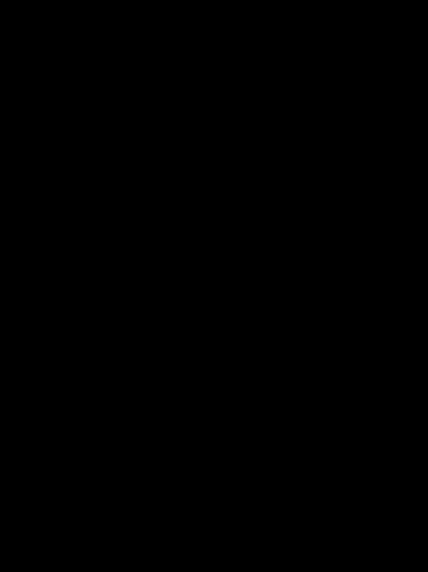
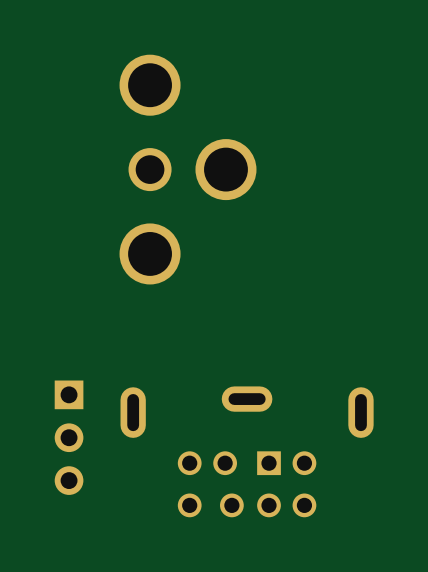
part: none -> (188, 169)
part: none -> (69, 437)
part: none -> (247, 451)

